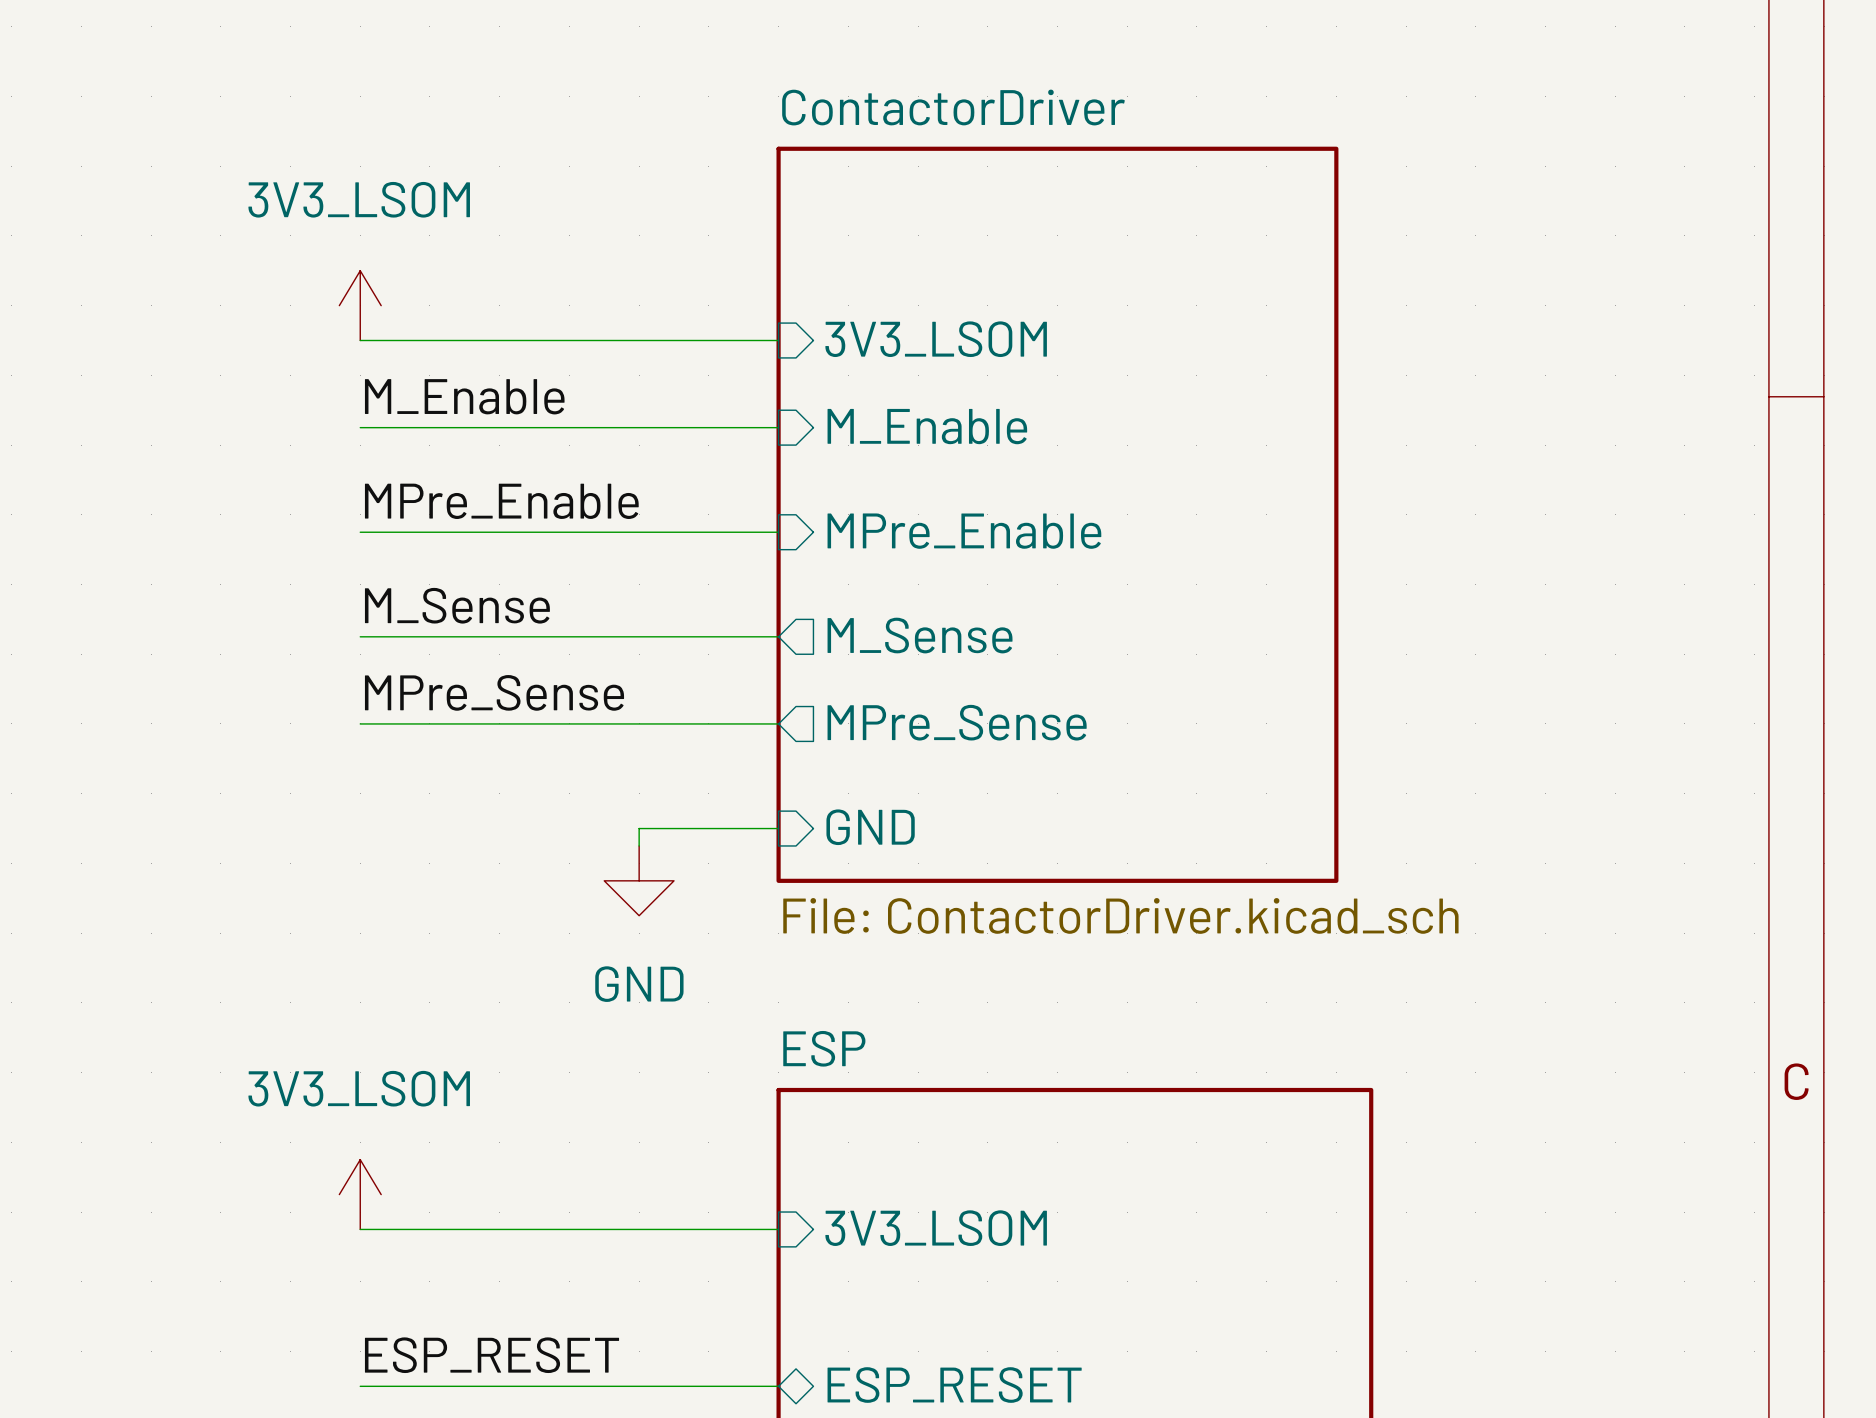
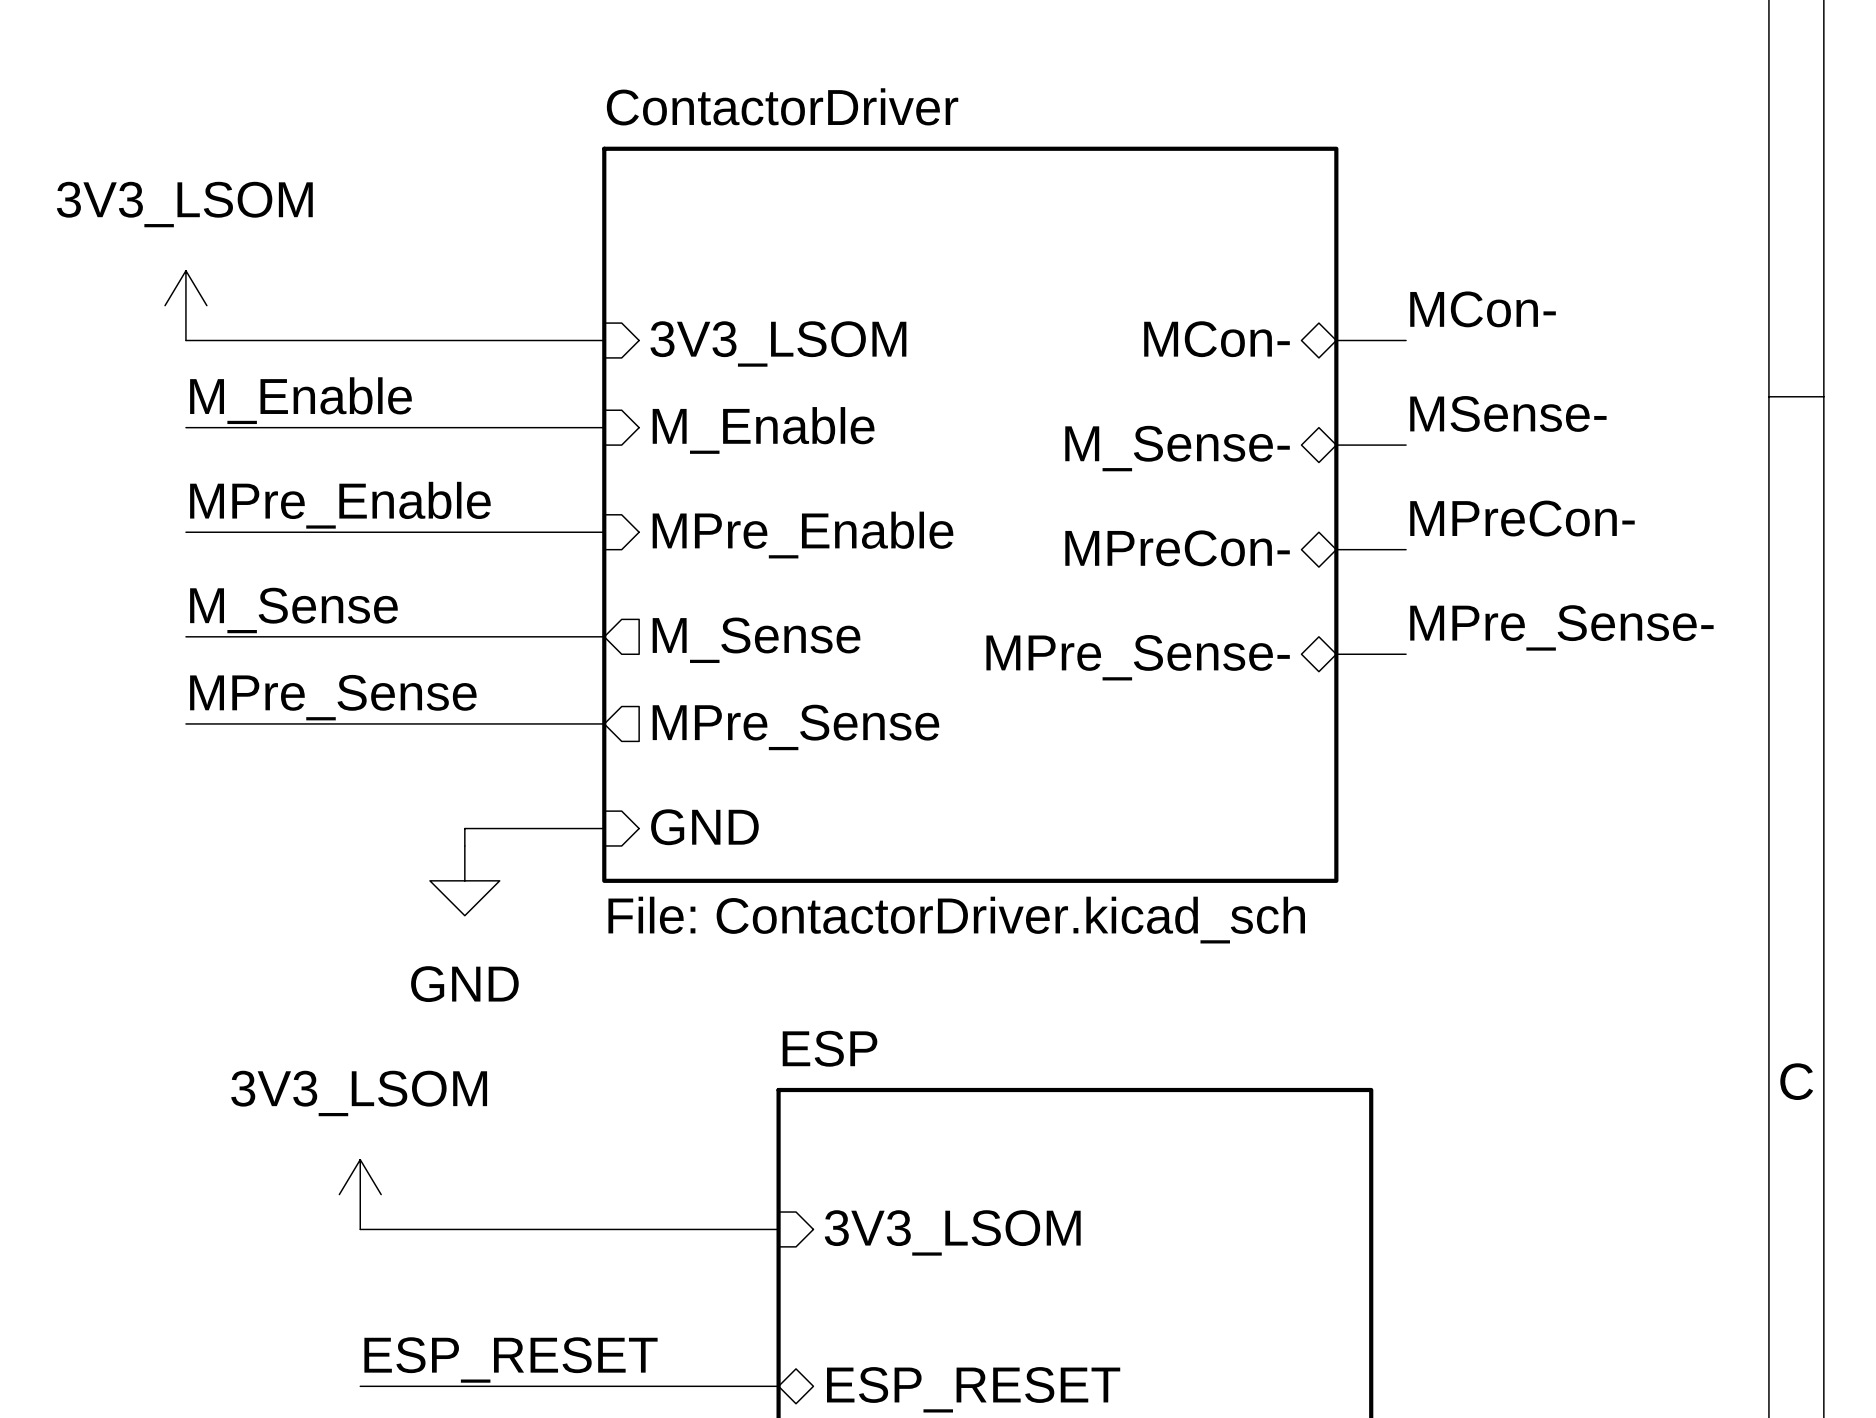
power symbol position: 3V3_LSOM (360, 305) -> 3V3_LSOM (185, 305)
label: none -> MCon- (1483, 309)
sheet pin position: 3V3_LSOM (936, 339) -> 3V3_LSOM (778, 343)
sheet pin: none -> MCon- (1217, 339)
wire: (604, 340) (778, 340) -> (185, 340) (360, 340)
wire: none -> (1336, 340) (1406, 340)
label position: M_Enable (464, 396) -> M_Enable (300, 400)
label: none -> MSense- (1508, 413)
sheet pin position: M_Enable (927, 426) -> M_Enable (763, 430)
wire: (604, 427) (778, 427) -> (185, 427) (360, 427)
sheet pin: none -> M_Sense- (1177, 448)
wire: none -> (1336, 445) (1406, 445)
label position: MPre_Enable (501, 501) -> MPre_Enable (340, 505)
sheet ContactorDriver: none -> File: ContactorDriver.kicad_sch (970, 514)
sheet ContactorDriver: File: ContactorDriver.kicad_sch (1057, 514) -> none
label: none -> MPreCon- (1522, 518)
sheet pin position: MPre_Enable (964, 531) -> MPre_Enable (803, 535)
wire: (604, 532) (778, 532) -> (185, 532) (360, 532)
sheet pin: none -> MPreCon- (1177, 548)
wire: none -> (1336, 549) (1406, 549)
label position: M_Sense (457, 605) -> M_Sense (293, 610)
label: none -> MPre_Sense- (1561, 627)
sheet pin position: M_Sense (920, 635) -> M_Sense (756, 640)
wire: (604, 636) (778, 636) -> (185, 636) (360, 636)
sheet pin: none -> MPre_Sense- (1138, 657)
wire: none -> (1336, 654) (1406, 654)
label position: MPre_Sense (494, 692) -> MPre_Sense (333, 697)
sheet pin position: MPre_Sense (957, 722) -> MPre_Sense (795, 727)
wire: (604, 723) (778, 723) -> (185, 723) (360, 723)
sheet pin position: GND (870, 827) -> GND (704, 827)
wire: (778, 828) (639, 828) (639, 845) -> (604, 828) (464, 828) (464, 845)
power symbol position: GND (639, 880) -> GND (464, 880)

